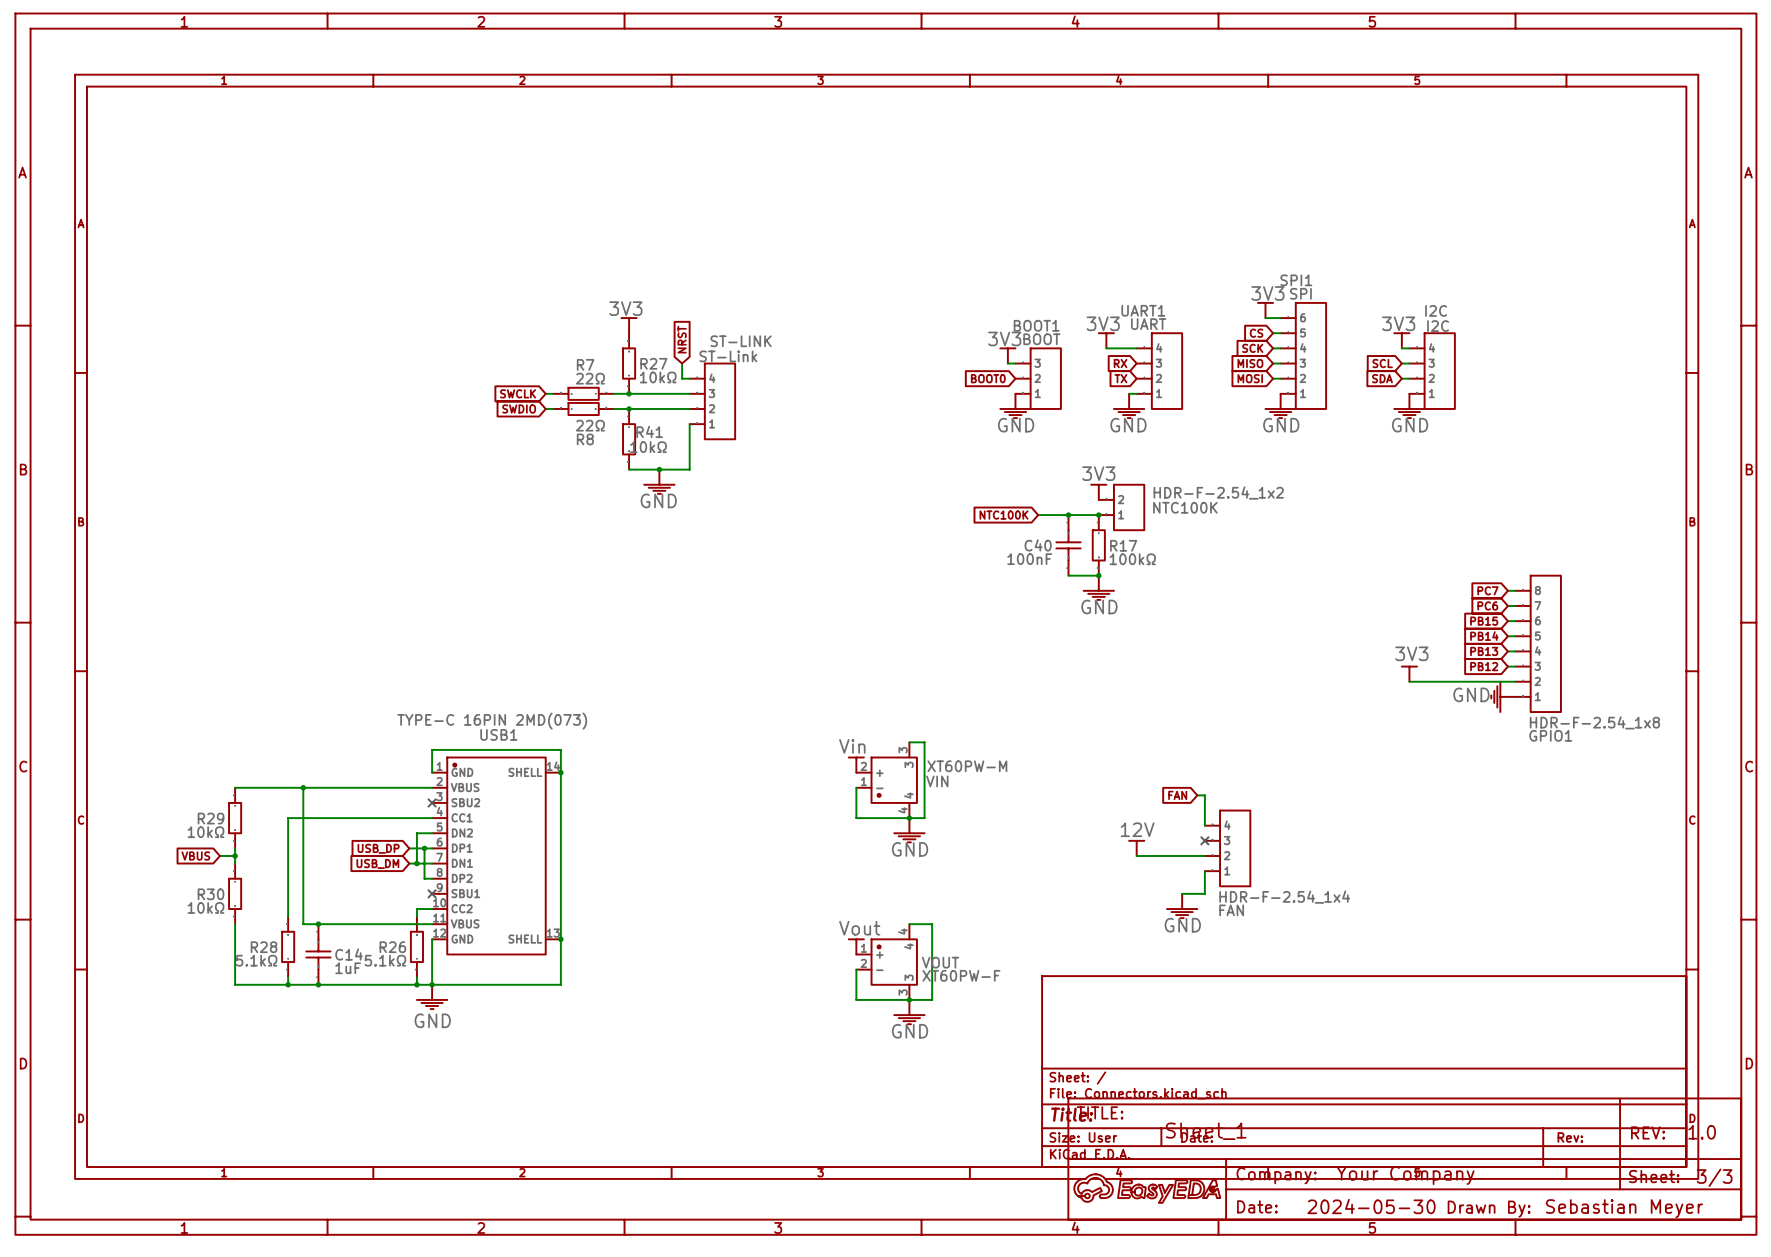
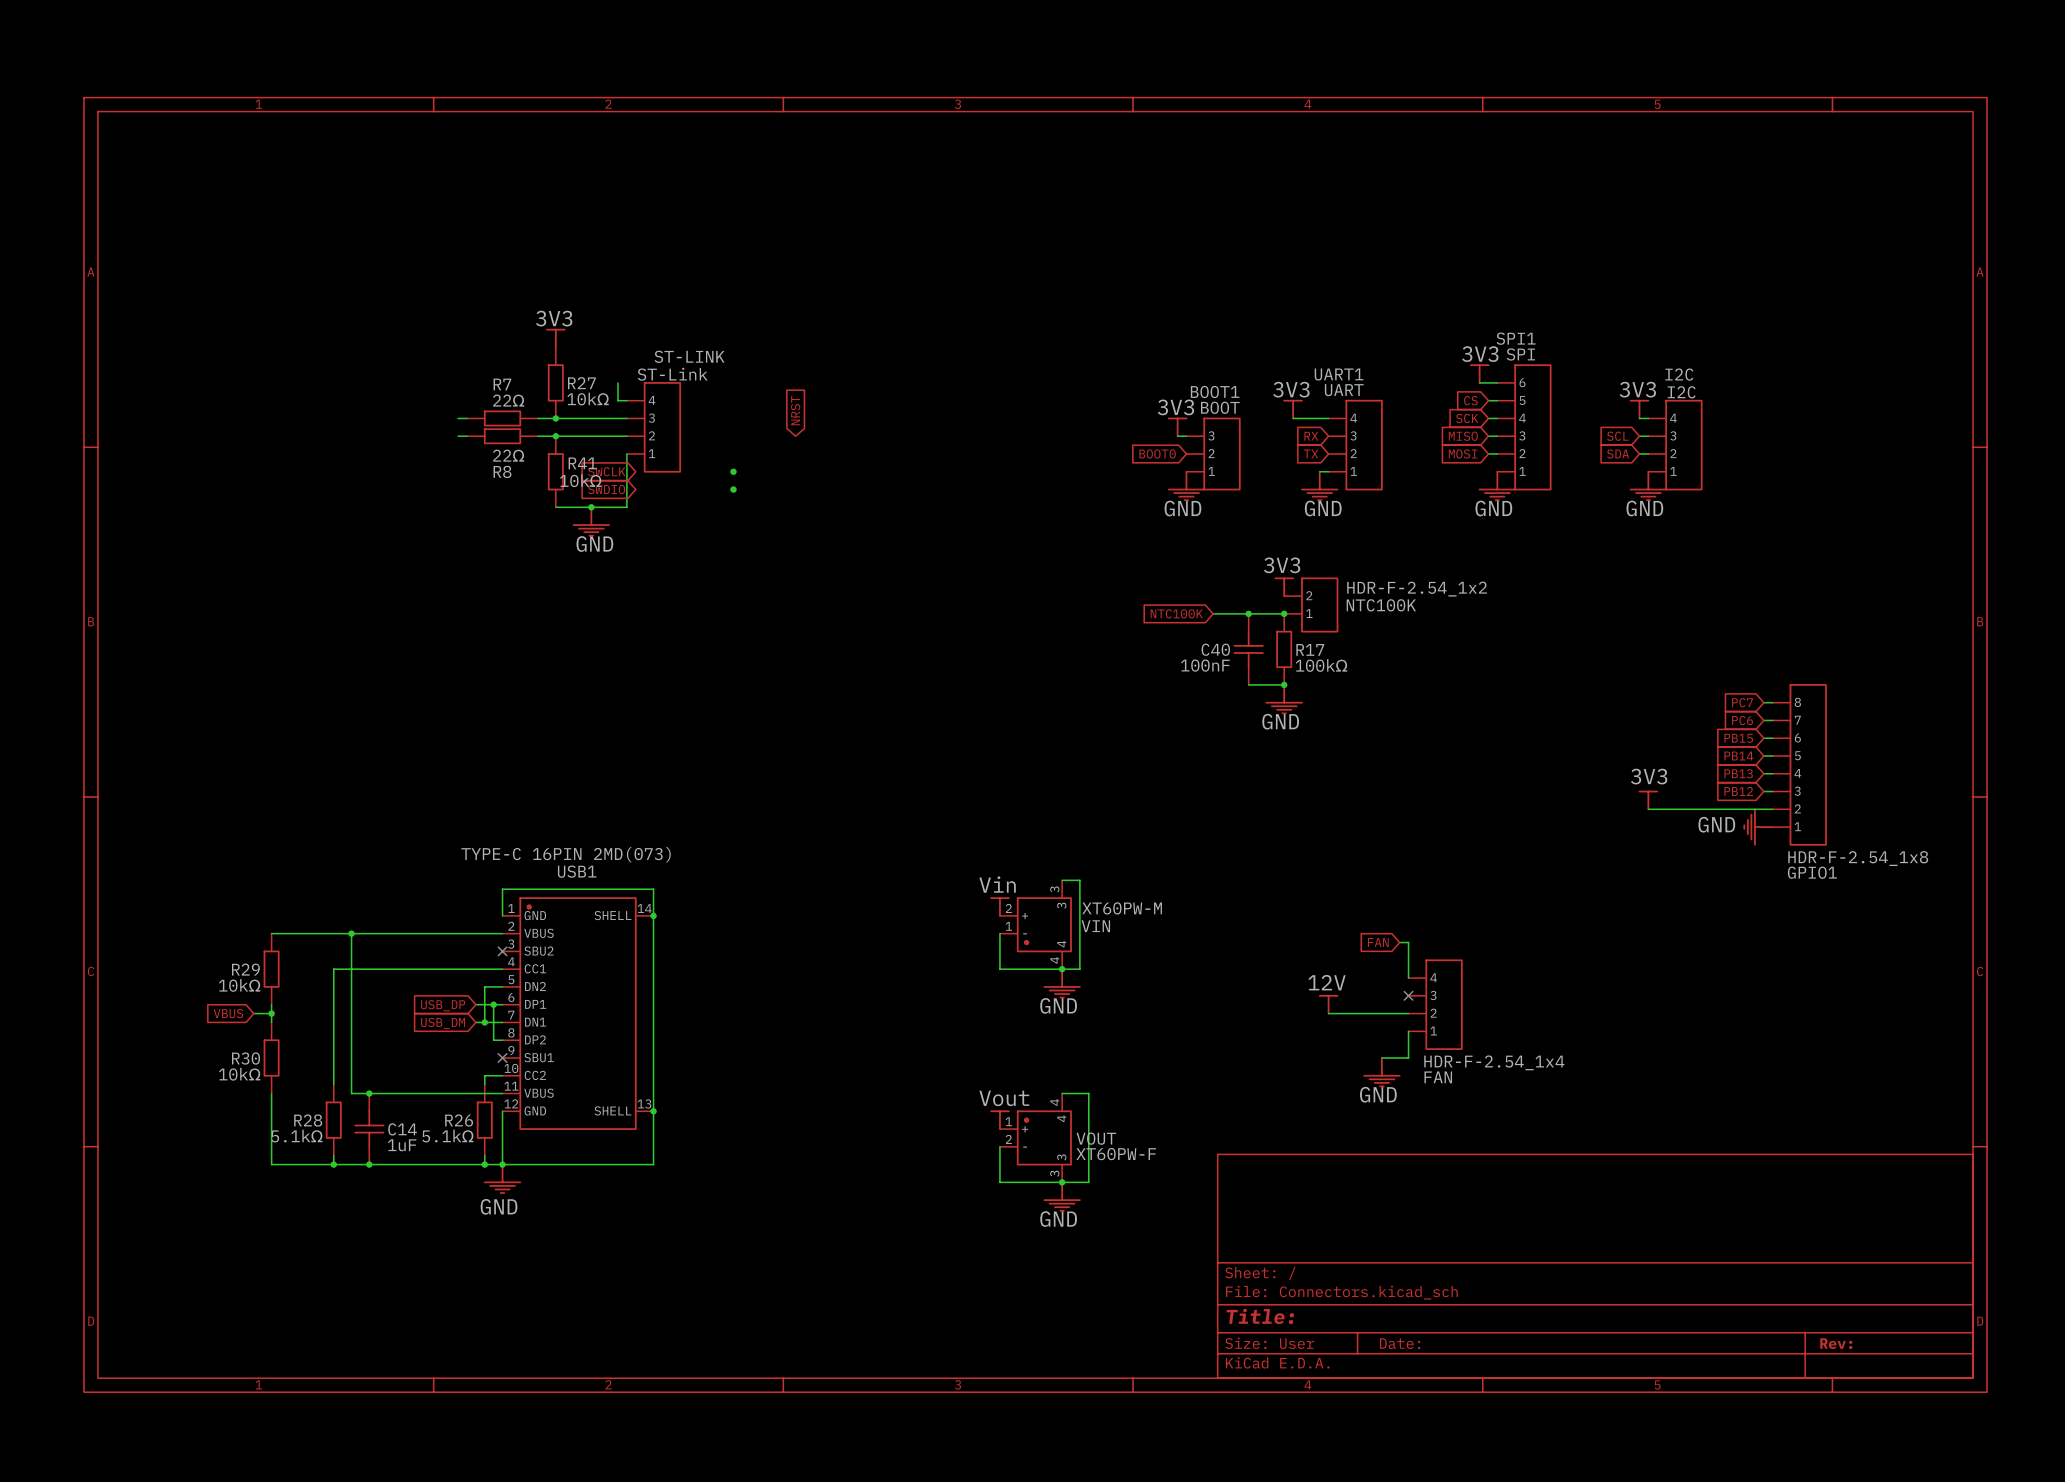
power symbol: none -> 3V3 (555, 338)
wire: none -> (618, 382) (618, 400) (626, 400)
power symbol: 3V3 (629, 325) -> none
wire: none -> (458, 418) (467, 418)
wire: none -> (538, 418) (626, 418)
junction: none -> (555, 418)
ST-LINK: none -> ST-Link (653, 427)
wire: none -> (458, 436) (467, 436)
wire: none -> (538, 436) (626, 436)
junction: none -> (555, 436)
R27 position: (629, 363) -> (555, 382)
wire: (682, 363) (682, 378) (689, 378) -> none
wire: none -> (626, 454) (626, 507) (555, 507)
wire: (545, 393) (553, 393) -> none
R7 position: (583, 393) -> (502, 418)
wire: (613, 393) (689, 393) -> none
ST-LINK: ST-Link (712, 401) -> none
wire: (545, 408) (553, 408) -> none
R8 position: (583, 408) -> (502, 436)
wire: (613, 408) (689, 408) -> none
junction: none -> (591, 507)
wire: (689, 424) (689, 469) (629, 469) -> none
power symbol: none -> GND (591, 521)
R41 position: (629, 439) -> (555, 471)
junction: (659, 469) -> none
power symbol: GND (659, 481) -> none
part: (885, 624) -> none

